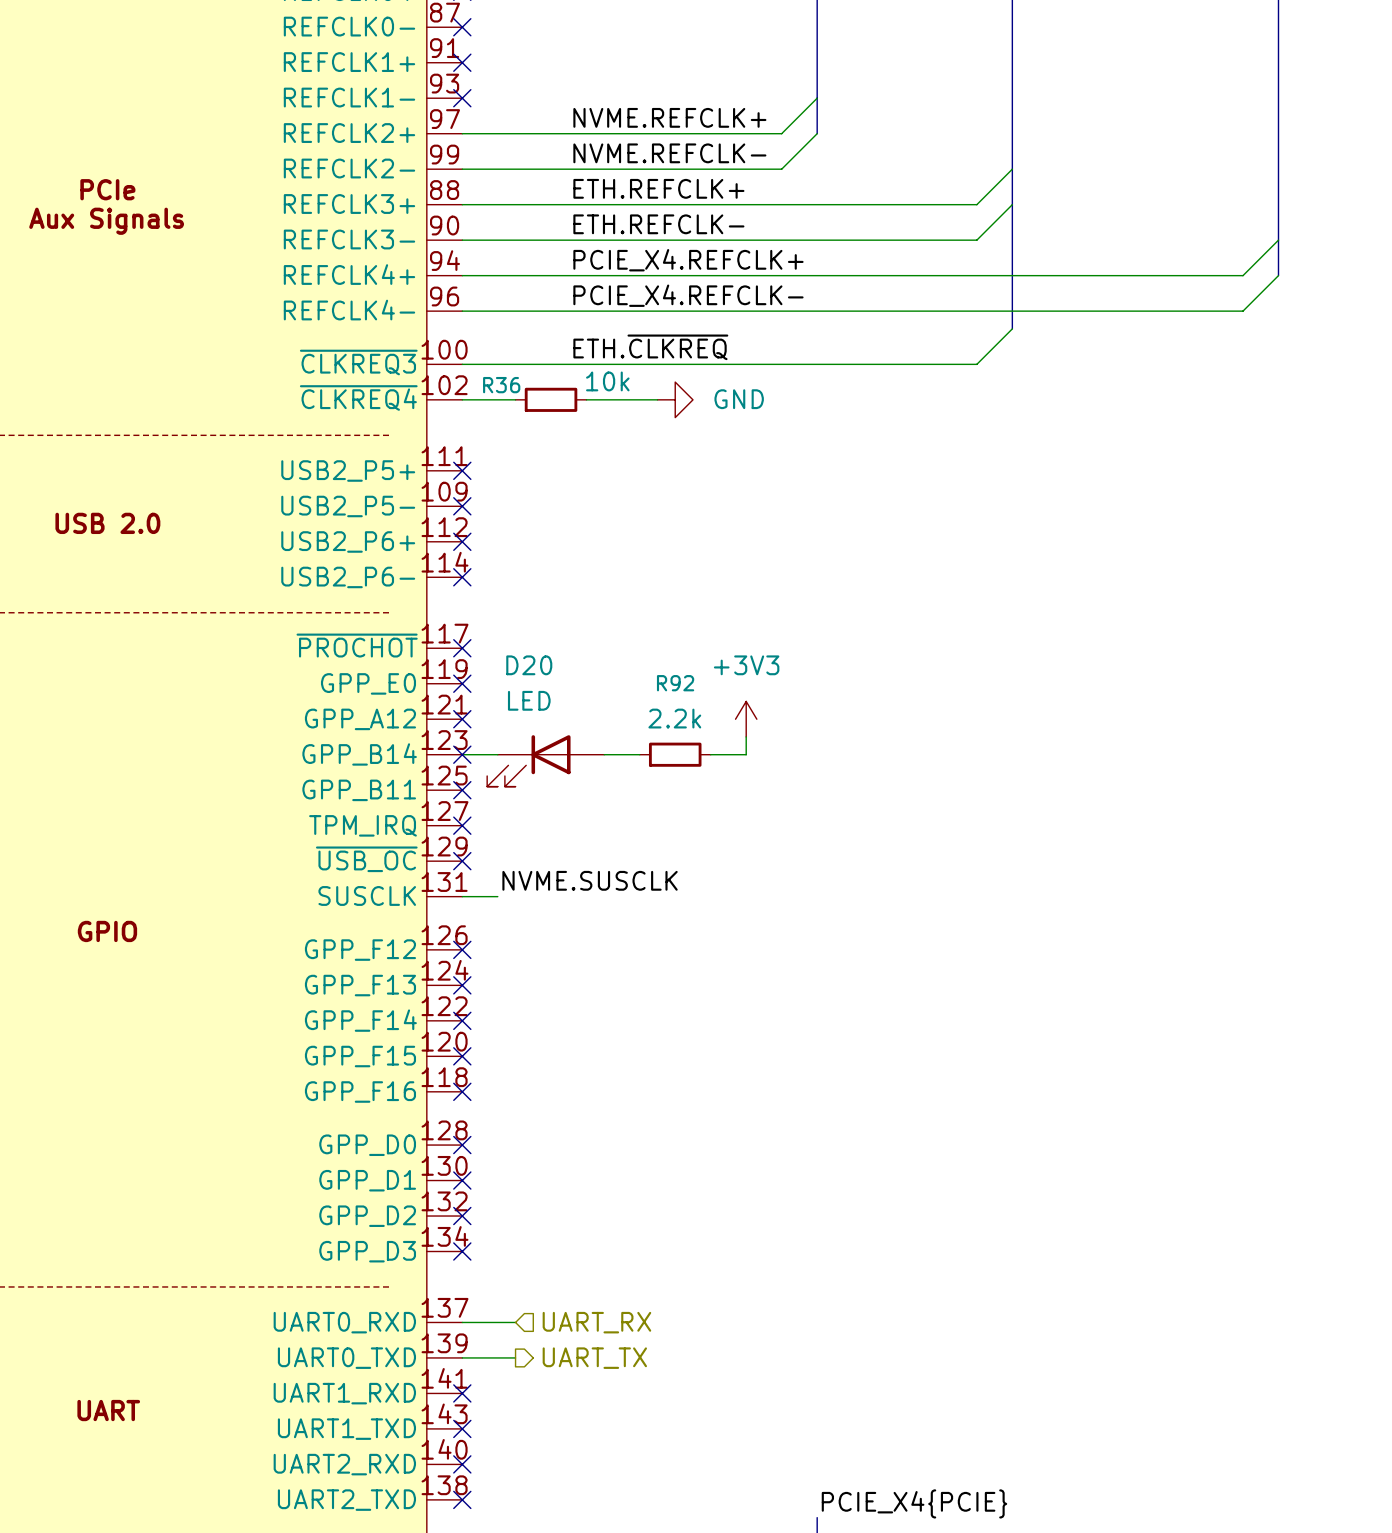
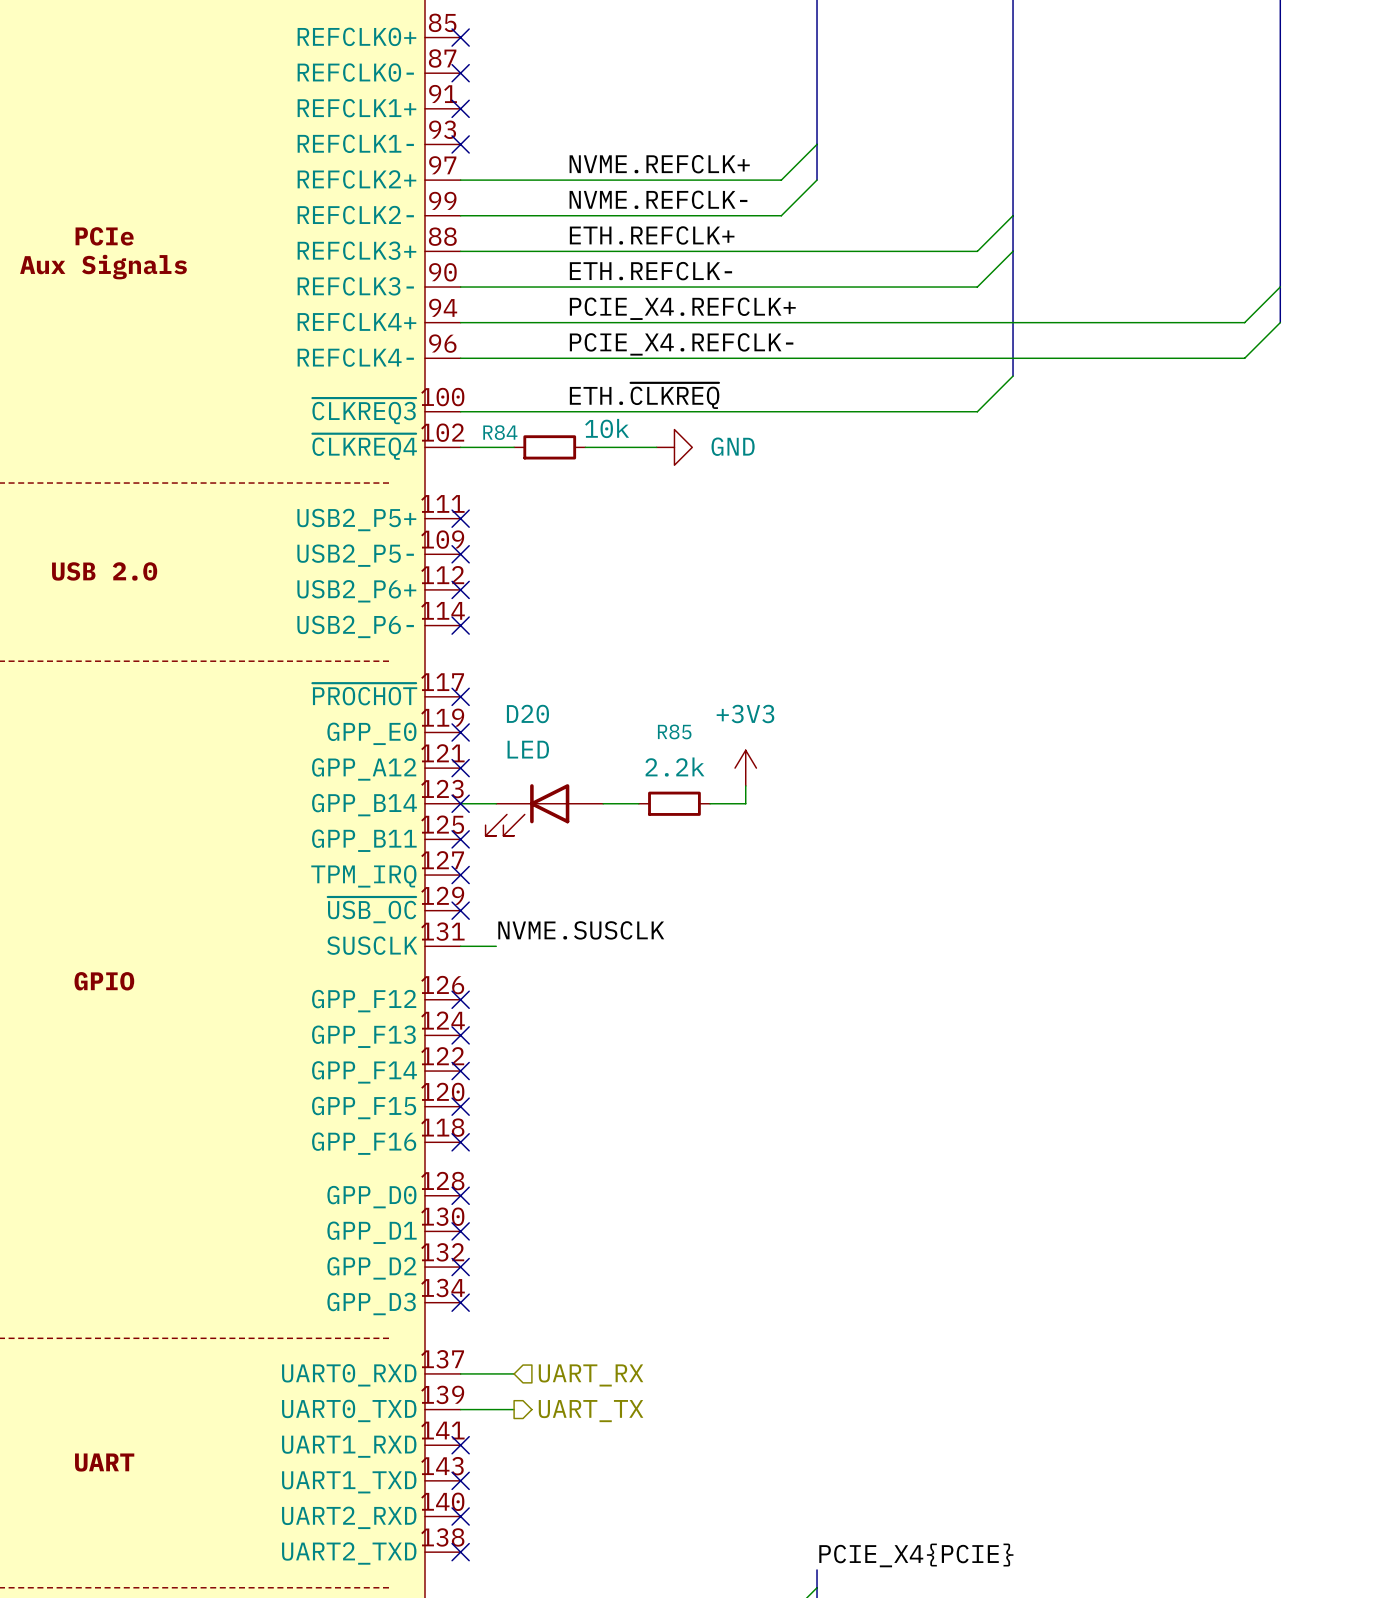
R36 name: R36 (501, 385) -> R84 (500, 432)
R92 name: R92 (675, 683) -> R85 (674, 731)

